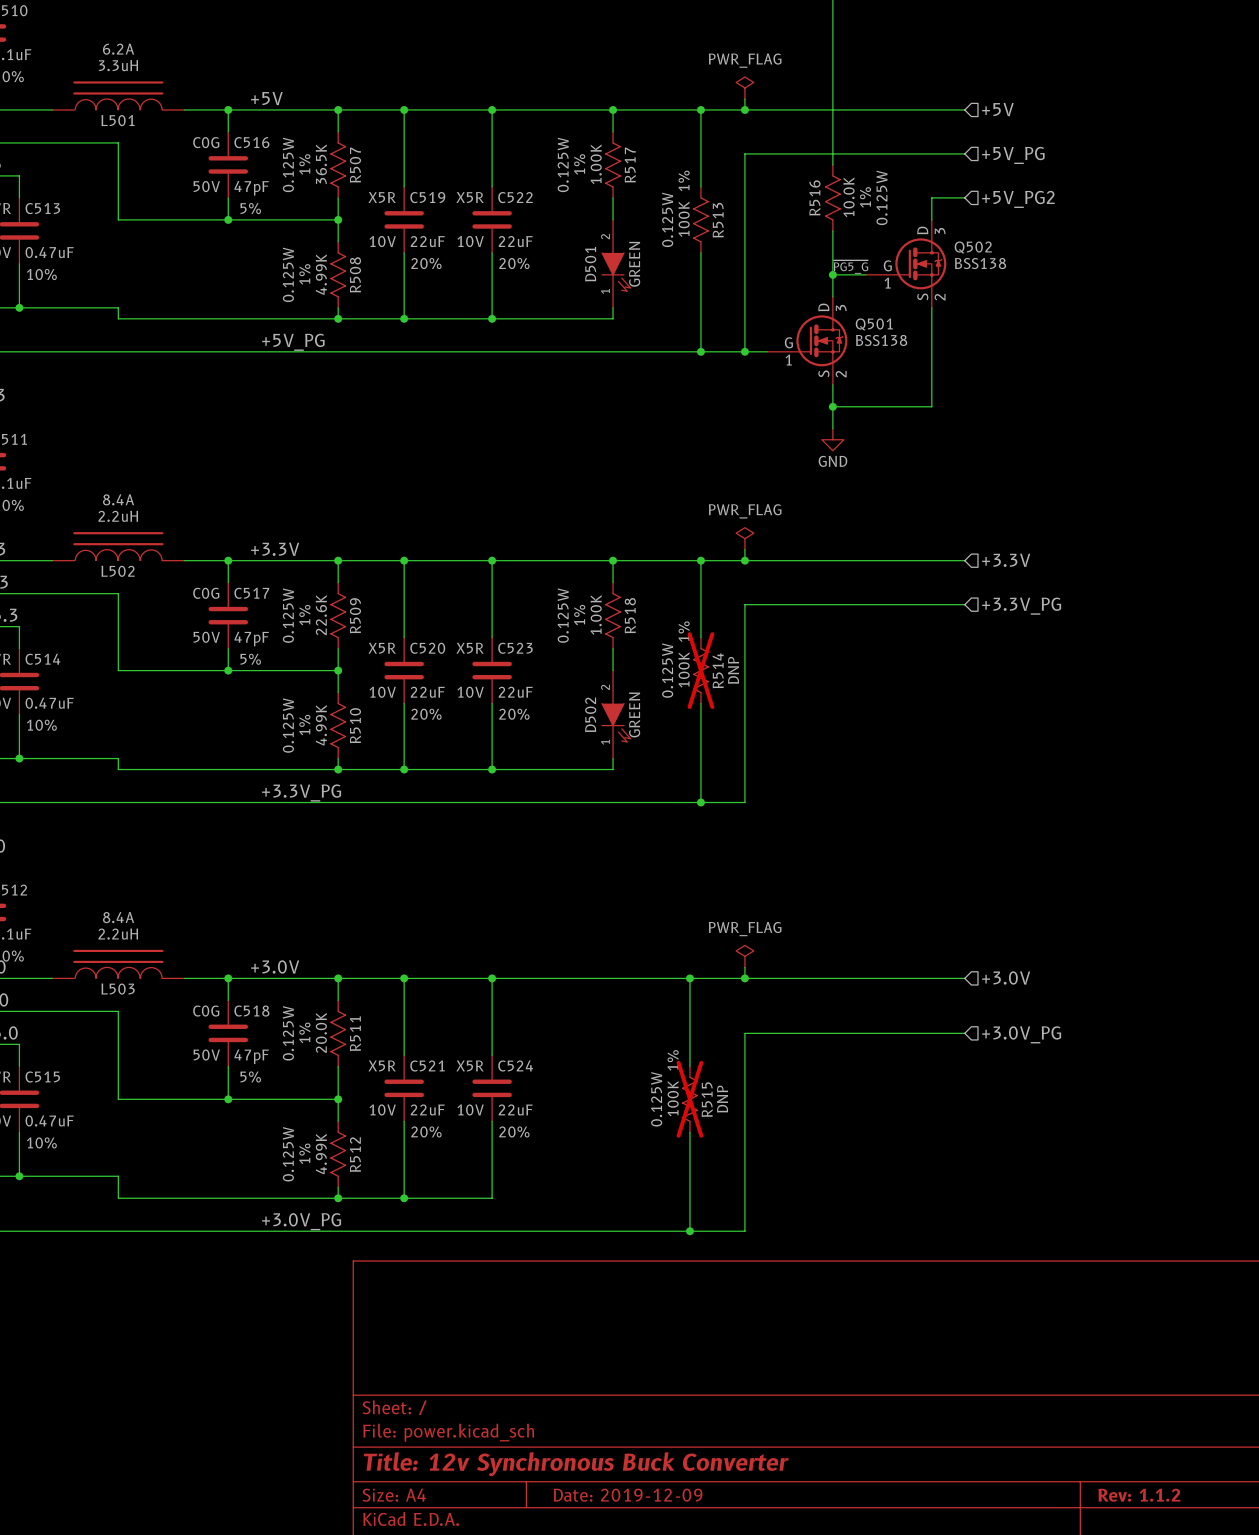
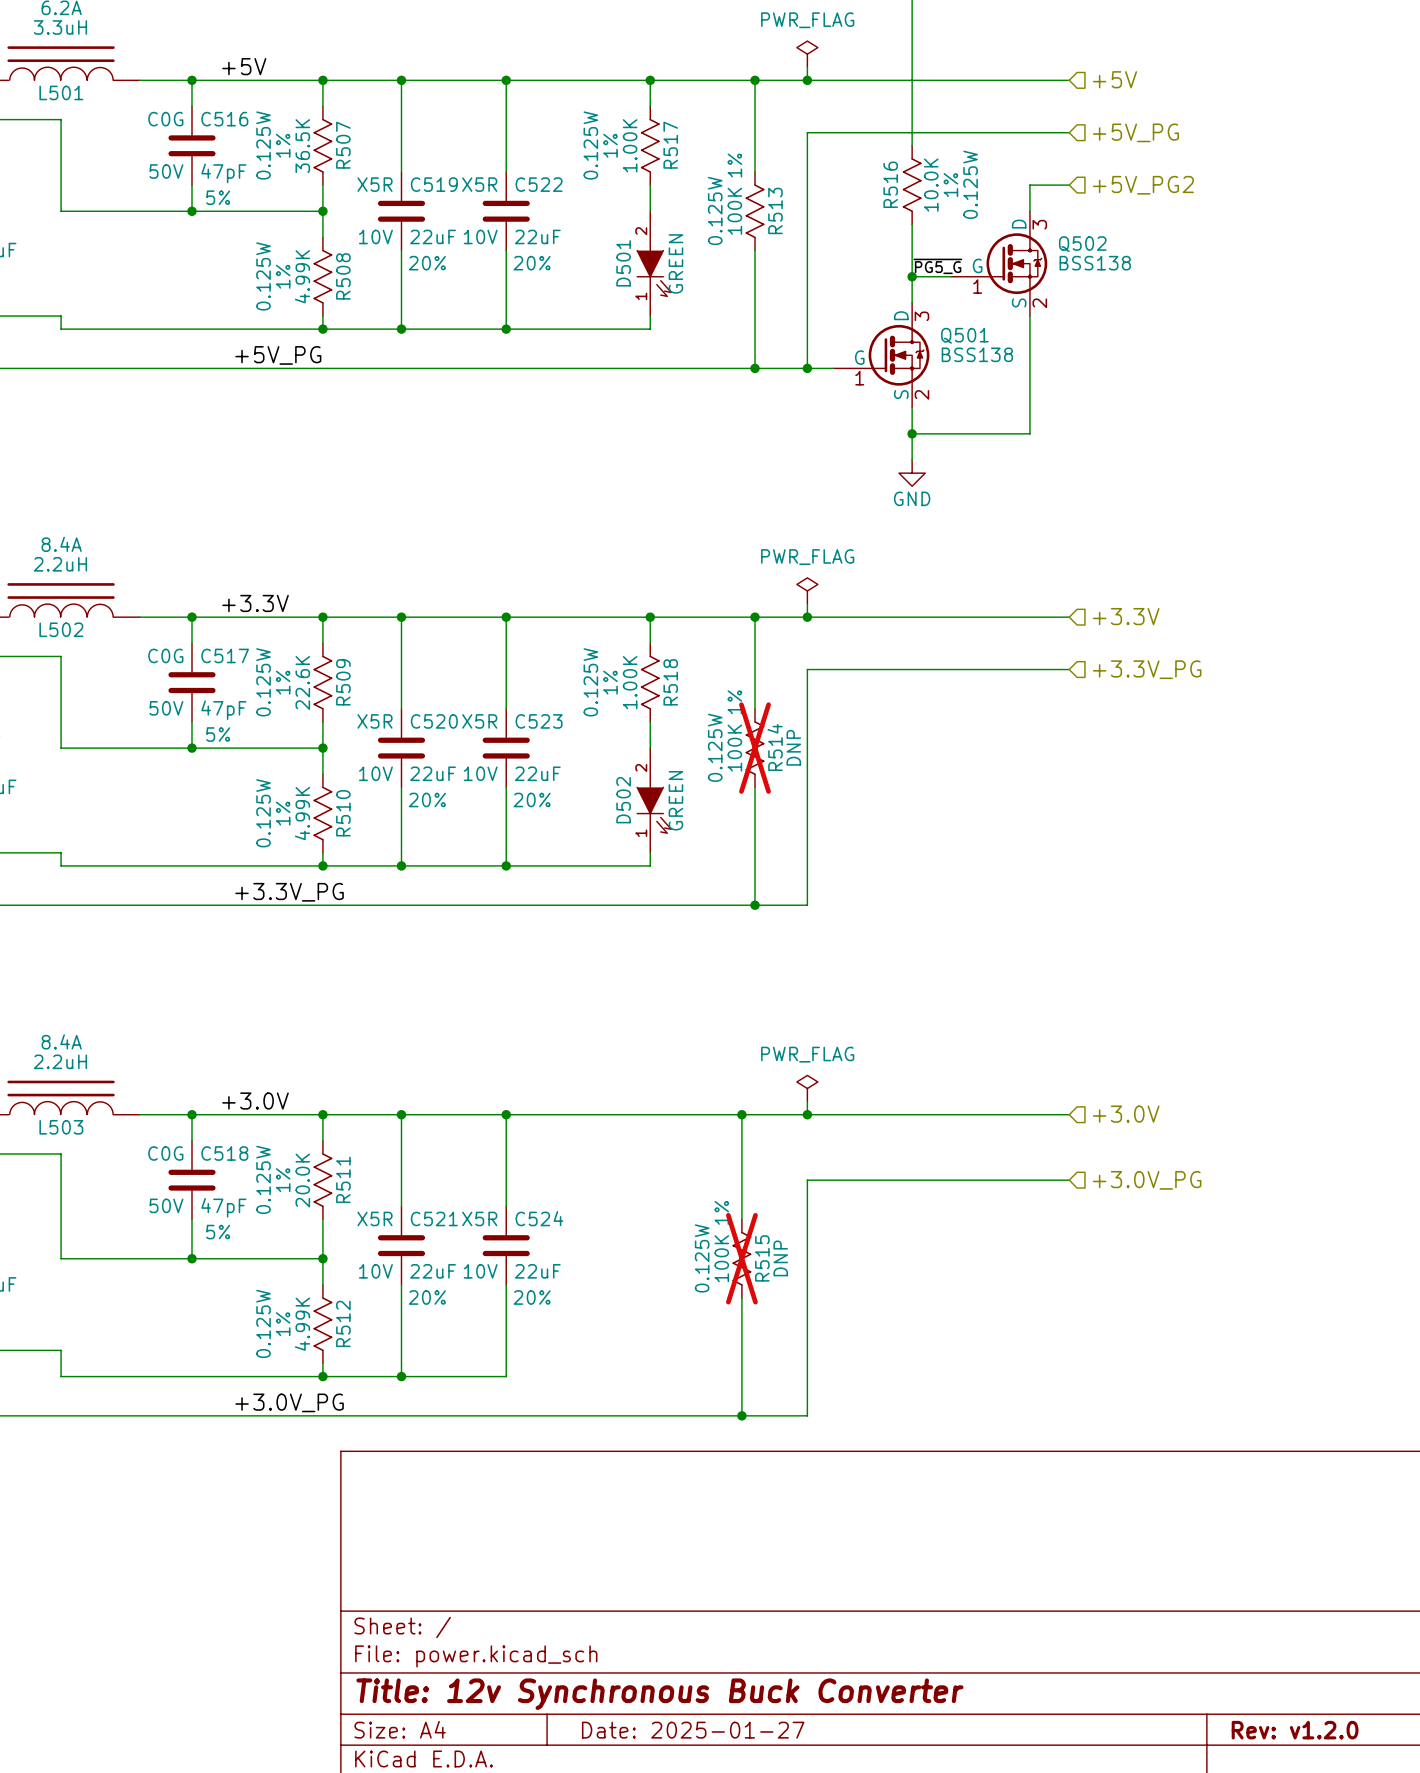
title block: Date: 2019-12-09 (628, 1495) -> Date: 2025-01-27 (693, 1730)
title block: Rev: 1.1.2 (1139, 1495) -> Rev: v1.2.0 (1295, 1730)

